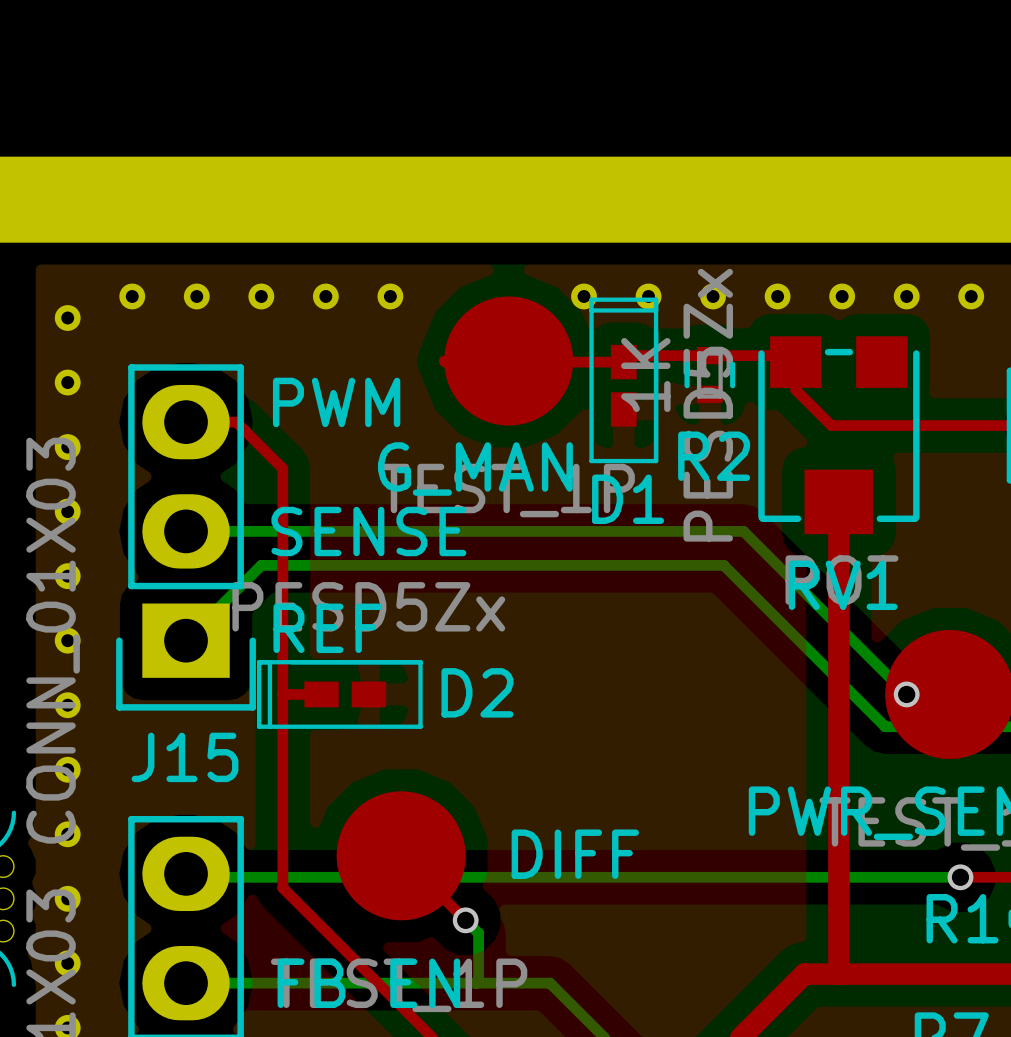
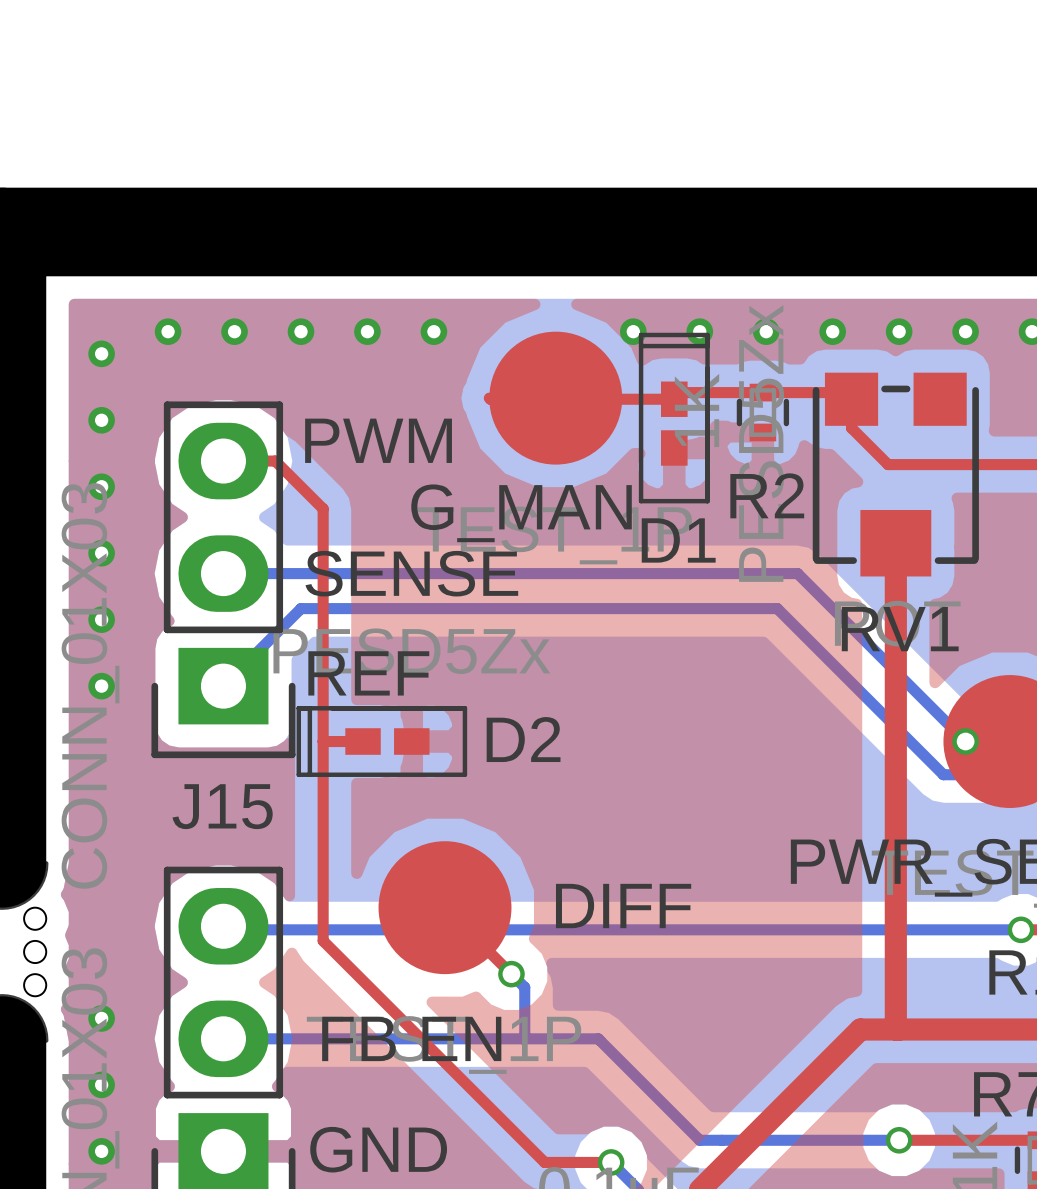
part: (67, 705) -> none
part: (67, 769) -> none
part: (67, 834) -> none
part: (67, 898) -> none

